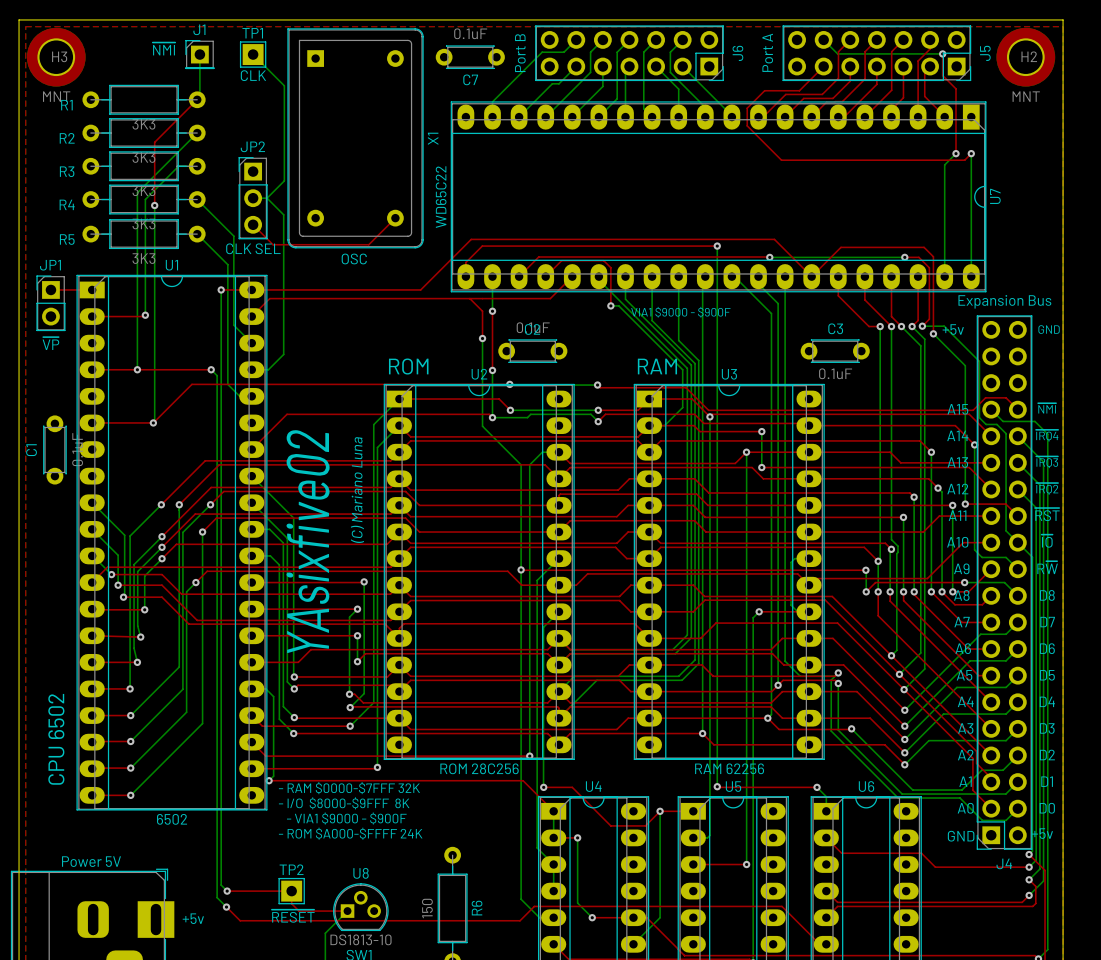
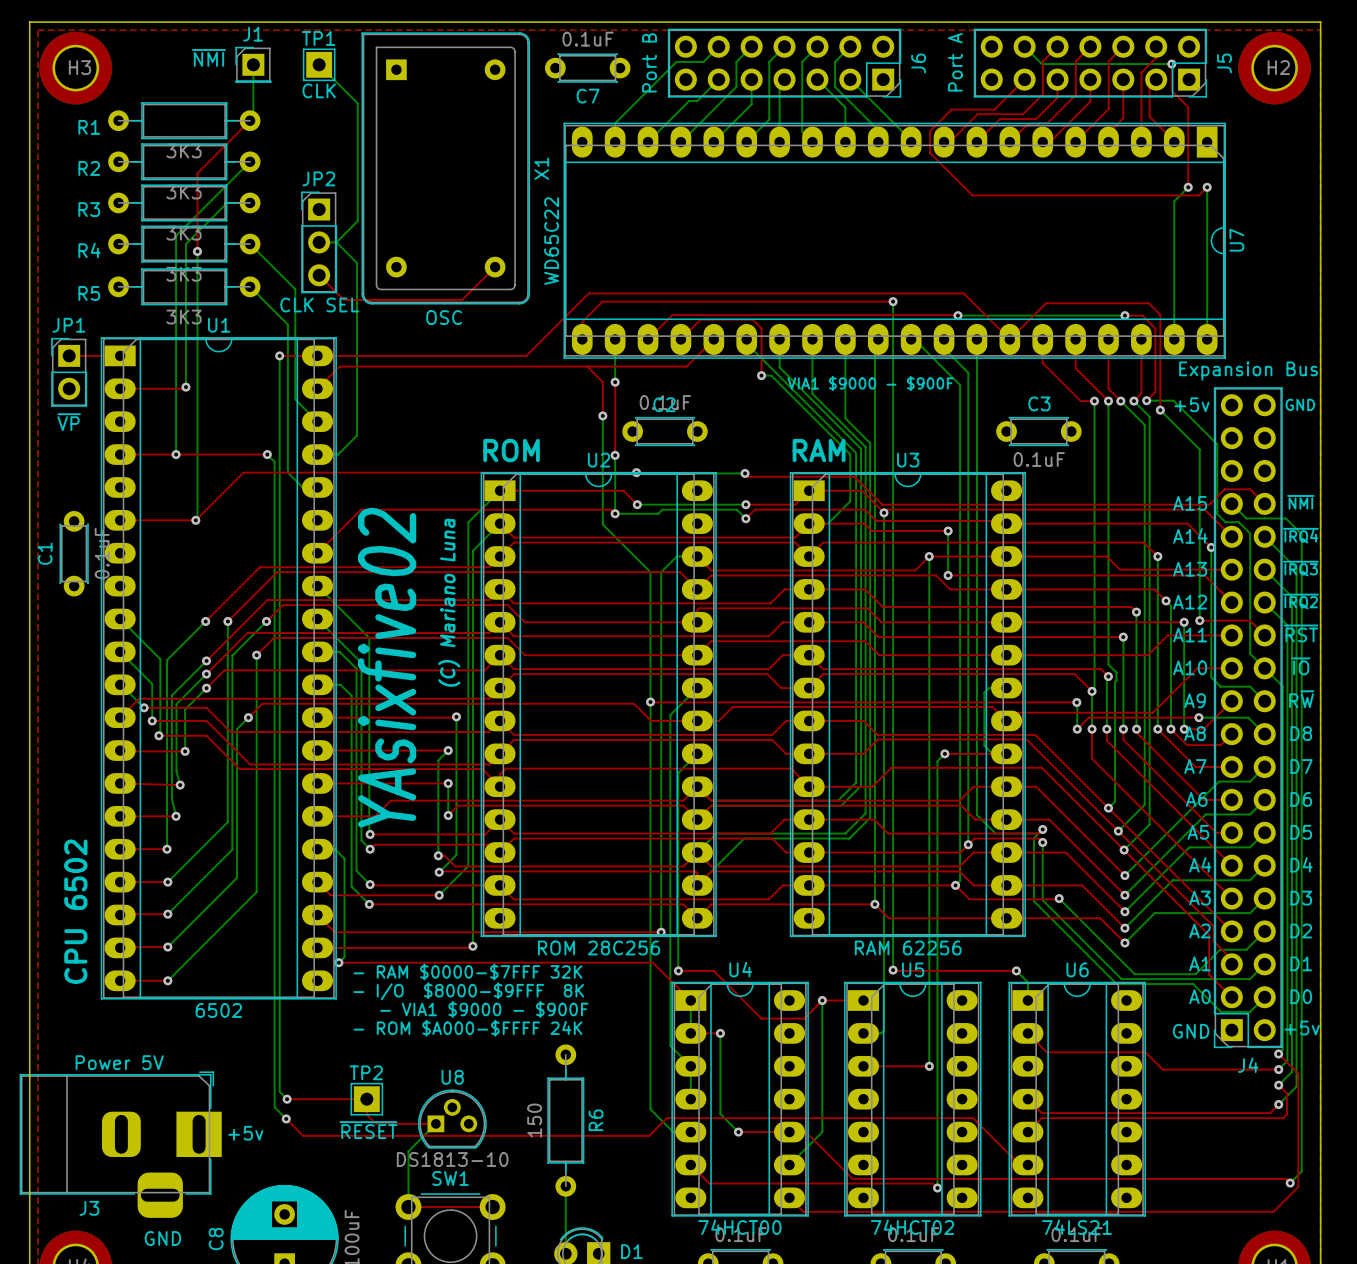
H3 value: MNT (56, 96) -> none
H2 value: MNT (1026, 96) -> none

